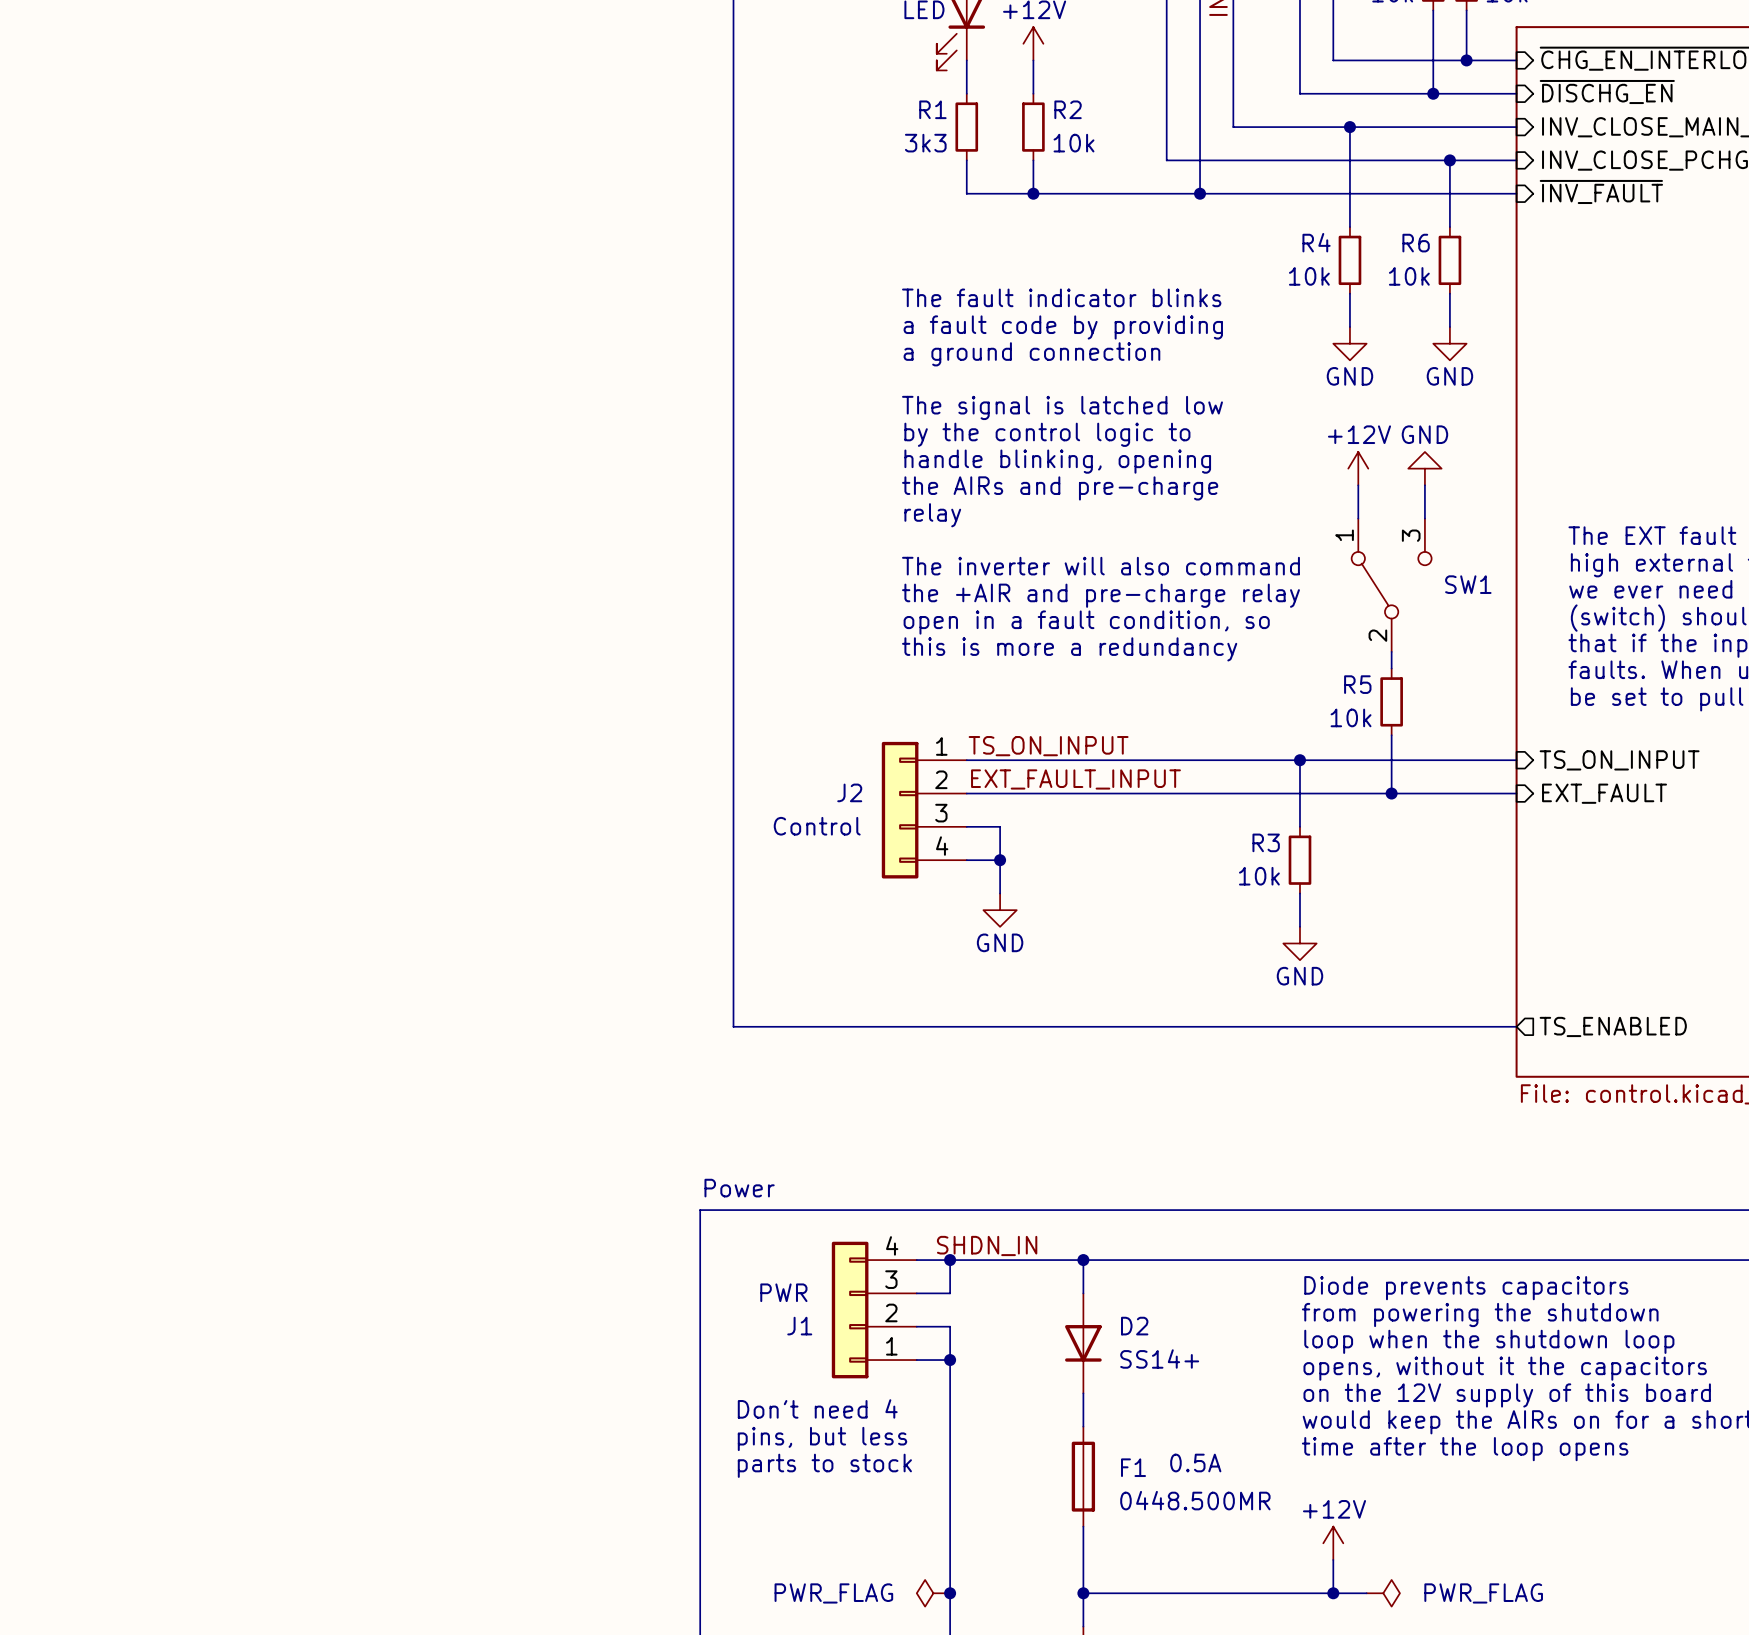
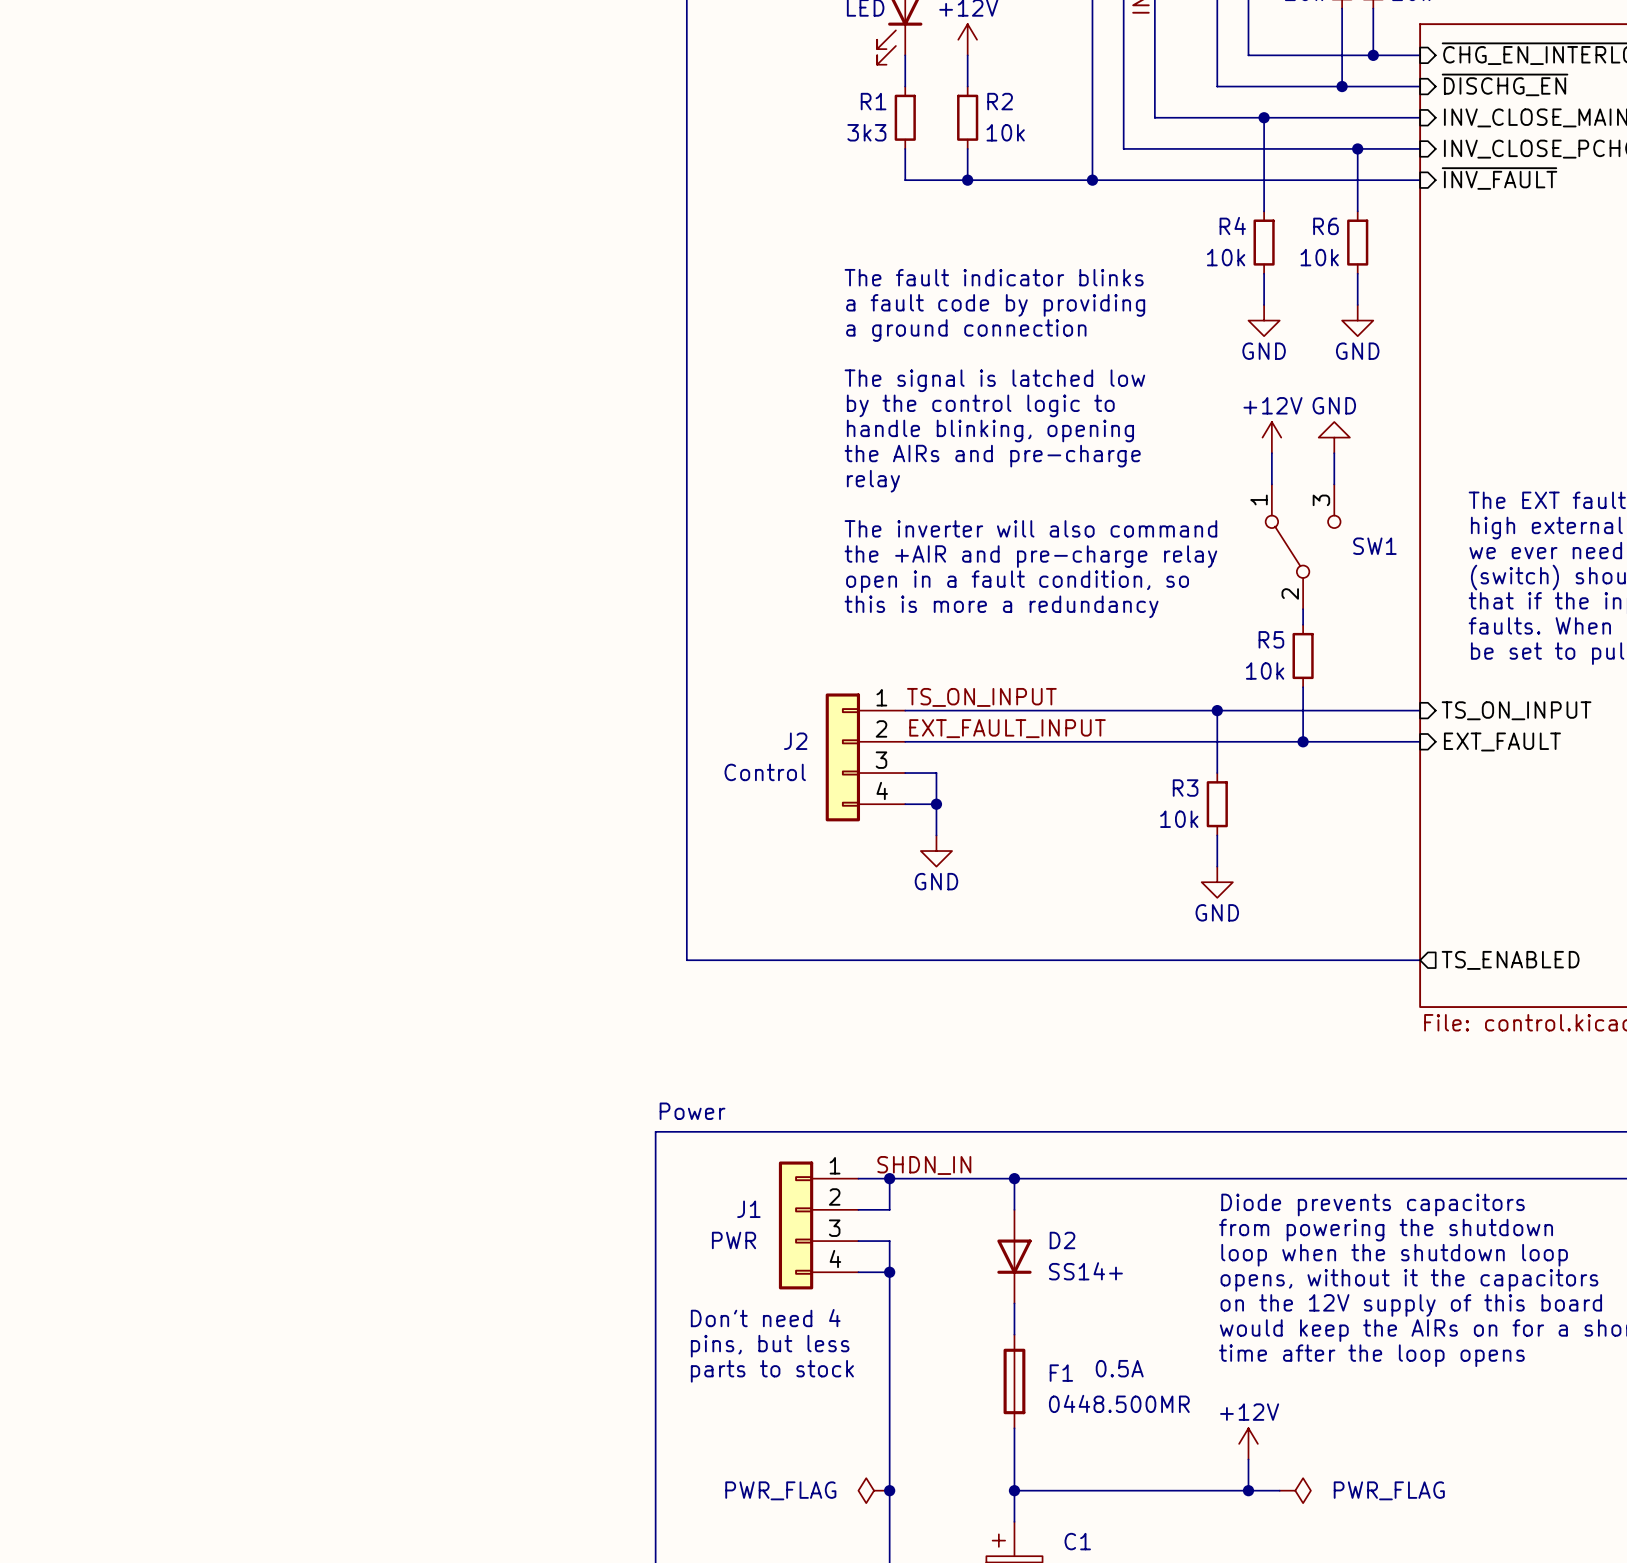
wire: (1166, 160) (1200, 160) (1200, 193) -> (1092, 148) (1092, 180)
junction position: (1200, 193) -> (1092, 180)
J1 flip: as is (850, 1310) -> up-down (796, 1225)

